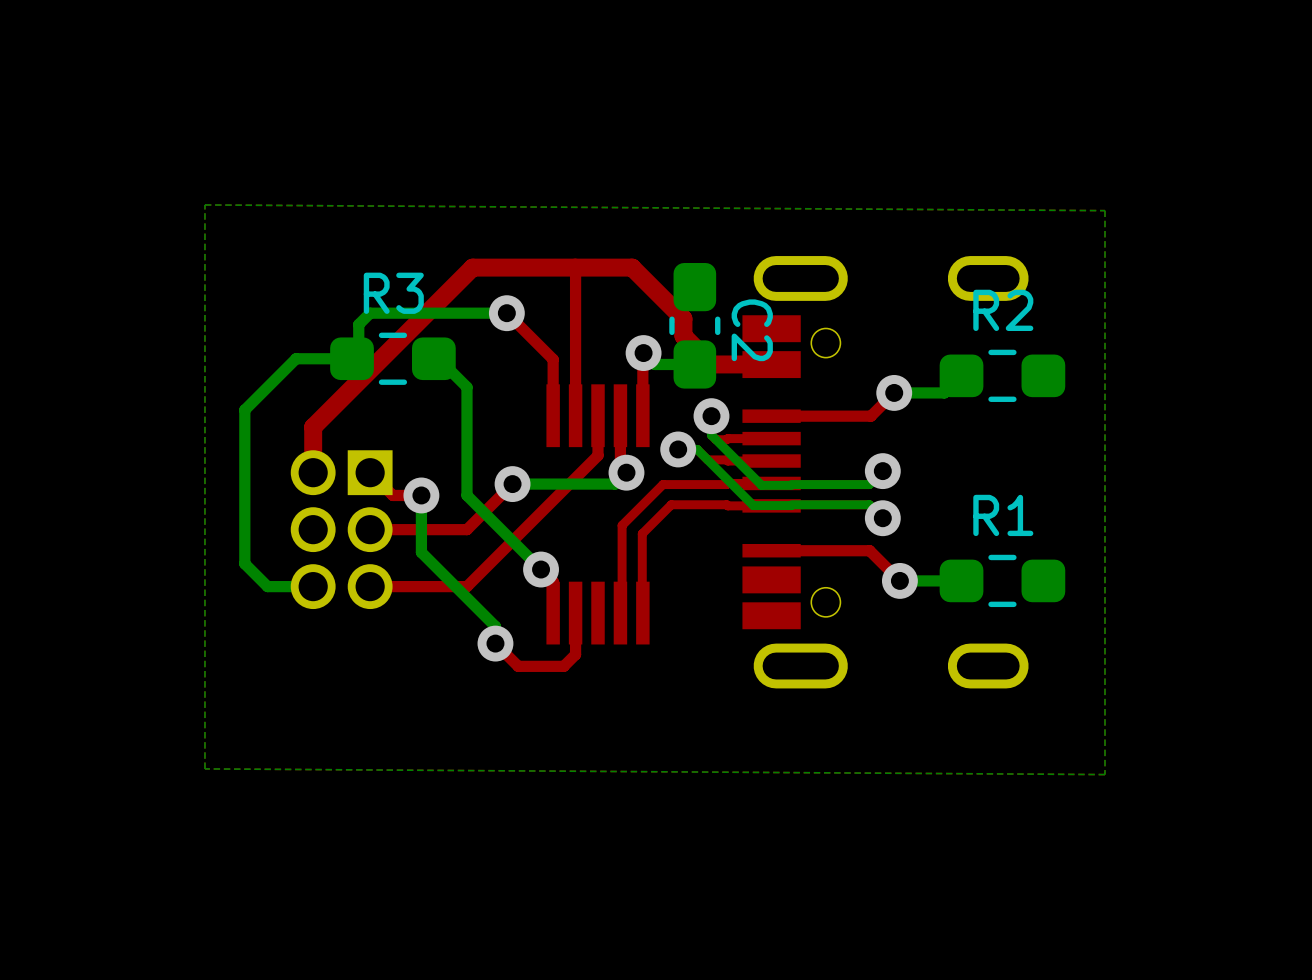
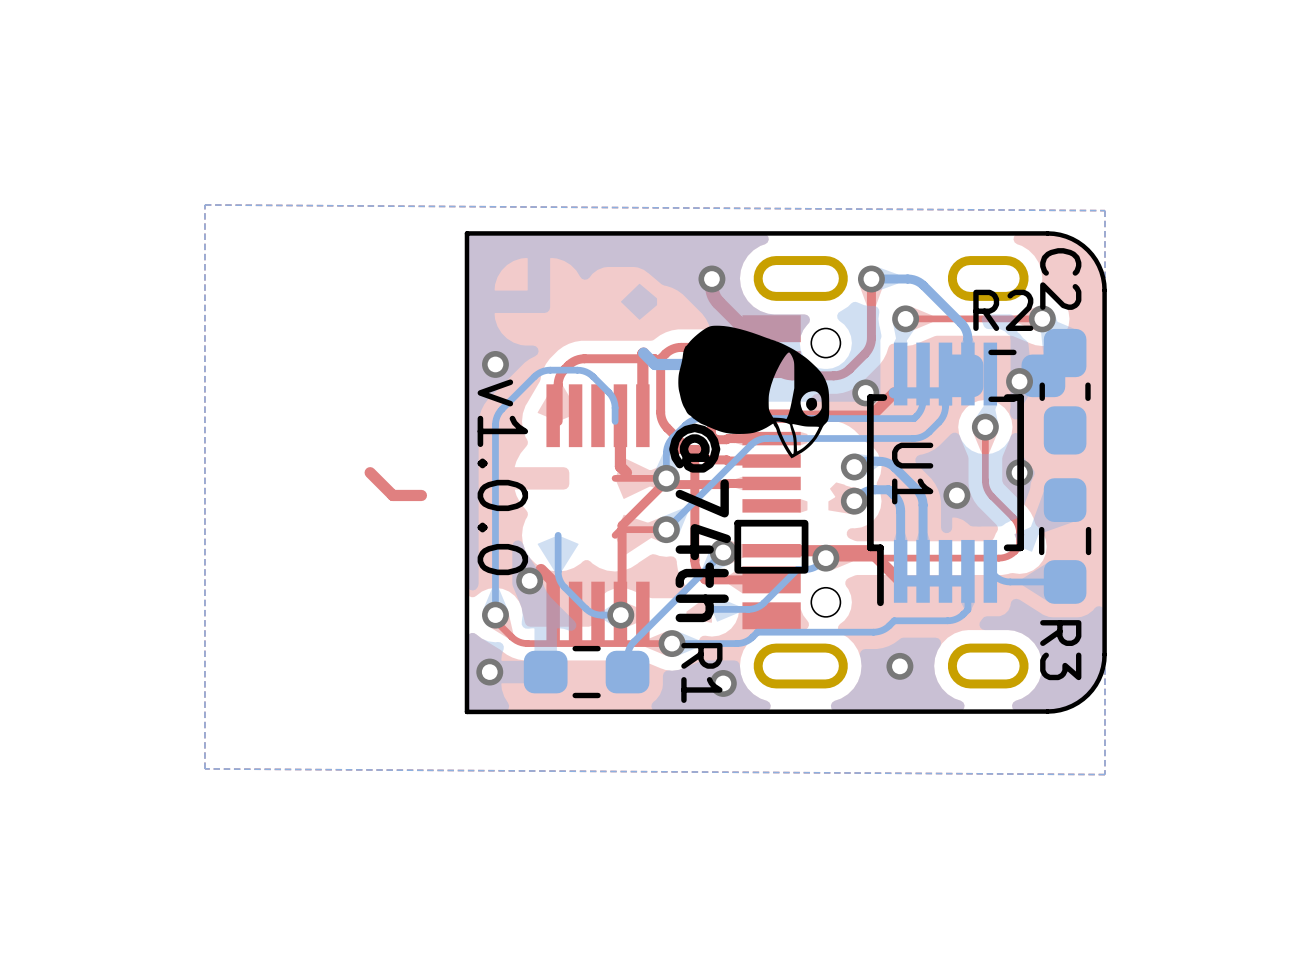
board edge: none -> (1047, 233) (466, 233) (466, 711) (1047, 711) (1066, 708) (1083, 699) (1098, 679) (1104, 654) (1104, 284) (1098, 265) (1083, 245) (1066, 236) (1047, 233)
top track: (575, 267) (575, 415) -> none
top track: none -> (711, 279) (714, 298) (739, 323) (749, 328) (771, 328)
via: none -> (711, 279)
top track: none -> (871, 279) (870, 344) (866, 352) (847, 371) (836, 375) (789, 375) (779, 372) (771, 364)
bottom track: none -> (871, 279) (910, 279) (923, 285) (965, 328) (967, 337) (967, 374)
via: none -> (871, 279)
R3 name position: R3 (393, 293) -> R3 (1060, 650)
top track: (506, 313) (553, 359) (553, 415) -> none
bottom track: (506, 313) (370, 313) (358, 324) (358, 352) (352, 358) (296, 358) (244, 410) (244, 563) (267, 586) (313, 586) -> none
via: (506, 313) -> none
via: none -> (905, 318)
top track: none -> (1042, 318) (905, 318)
via: none -> (1042, 318)
drawing: none -> [678, 325, 830, 459]
C2 position: (694, 325) -> (1065, 391)
C2 name position: C2 (752, 330) -> C2 (1060, 279)
via: (643, 353) -> none
R3 rotation: 0° (392, 358) -> 90° clockwise (1065, 541)
R3 position: (392, 358) -> (1065, 541)
bottom track: (433, 358) (438, 358) (466, 387) (466, 495) (541, 569) -> none
via: none -> (495, 364)
top track: none -> (660, 364) (654, 358) (584, 358) (573, 361) (563, 370) (559, 378) (558, 421)
top track: (711, 364) (683, 335) (683, 318) (632, 267) (472, 267) (313, 427) (313, 472) -> none
top track: none -> (738, 364) (727, 361) (713, 350) (705, 347) (679, 347) (668, 351) (660, 358) (661, 416) (665, 426) (690, 451) (694, 459) (694, 560) (698, 572) (705, 579) (771, 579)
bottom track: none -> (923, 374) (922, 404) (914, 418) (701, 418) (692, 420) (672, 437) (668, 444) (666, 478)
bottom track: none -> (945, 374) (943, 415) (923, 435) (913, 438) (766, 438) (758, 440) (750, 445) (666, 529)
via: none -> (1019, 381)
via position: (894, 392) -> (865, 392)
top track: (598, 415) (598, 455) (466, 586) (370, 586) -> none
bottom track: (711, 416) (711, 435) (761, 485) (791, 485) -> none
via: (711, 416) -> none
bottom track: none -> (615, 421) (614, 405) (611, 395) (590, 374) (577, 370) (548, 370) (539, 372) (498, 413) (495, 425) (495, 615)
top track: none -> (985, 427) (986, 486) (990, 494) (1017, 524) (1019, 546) (1012, 553) (998, 558) (825, 558)
via: none -> (985, 427)
bottom track: (678, 449) (697, 449) (753, 505) (791, 505) -> none
via position: (678, 449) -> (666, 478)
bottom track: none -> (854, 466) (860, 461) (887, 463) (919, 492) (923, 505) (923, 571)
via: none -> (854, 466)
bottom track: (882, 471) (869, 484) (791, 484) -> none
via: (882, 471) -> none
bottom track: (626, 472) (615, 484) (512, 484) -> none
via: (626, 472) -> none
via: none -> (1019, 472)
U1: none -> (945, 474)
text: none -> v1.0.0 (502, 477)
top track: none -> (666, 478) (615, 478)
top track: (512, 484) (466, 529) (370, 529) -> none
via: (512, 484) -> none
bottom track: (421, 495) (421, 552) (495, 626) (495, 643) -> none
via: (421, 495) -> none
via: none -> (956, 495)
bottom track: none -> (854, 501) (862, 493) (872, 489) (888, 489) (896, 498) (900, 508) (900, 571)
via: none -> (854, 501)
bottom track: (791, 504) (869, 504) (882, 518) -> none
R1 name rotation: 0° (1003, 515) -> 90° clockwise (701, 672)
R1 name position: R1 (1003, 515) -> R1 (701, 672)
top track: (882, 518) (869, 504) (671, 504) (642, 533) (642, 615) -> none
via: (882, 518) -> none
part: (341, 529) -> none
top track: none -> (666, 529) (620, 529) (615, 535)
via: none -> (666, 529)
bottom track: none -> (558, 535) (558, 573) (563, 585) (590, 612) (598, 614) (620, 615)
via size: [523, 551, 559, 588] -> [516, 567, 544, 595]
bottom track: none -> (723, 552) (632, 643) (627, 654) (627, 672)
via: none -> (723, 552)
bottom track: none -> (825, 558) (813, 567) (797, 569) (756, 607) (711, 609)
via: none -> (825, 558)
bottom track: none -> (967, 571) (967, 609) (960, 617) (951, 620) (894, 620) (886, 628) (875, 632) (757, 632) (749, 639) (739, 643) (672, 643)
bottom track: none -> (990, 571) (999, 578) (1007, 581) (1065, 581)
via: (899, 580) -> none
R1 position: (1002, 580) -> (586, 672)
top track: (575, 613) (575, 654) (563, 666) (518, 666) (495, 643) -> none
top track: none -> (495, 615) (495, 620) (511, 637) (524, 643) (672, 643)
via: none -> (495, 615)
via: none -> (620, 615)
via: (495, 643) -> none
via: none -> (672, 643)
via: none -> (899, 666)
via: none -> (489, 672)
via: none -> (723, 683)

